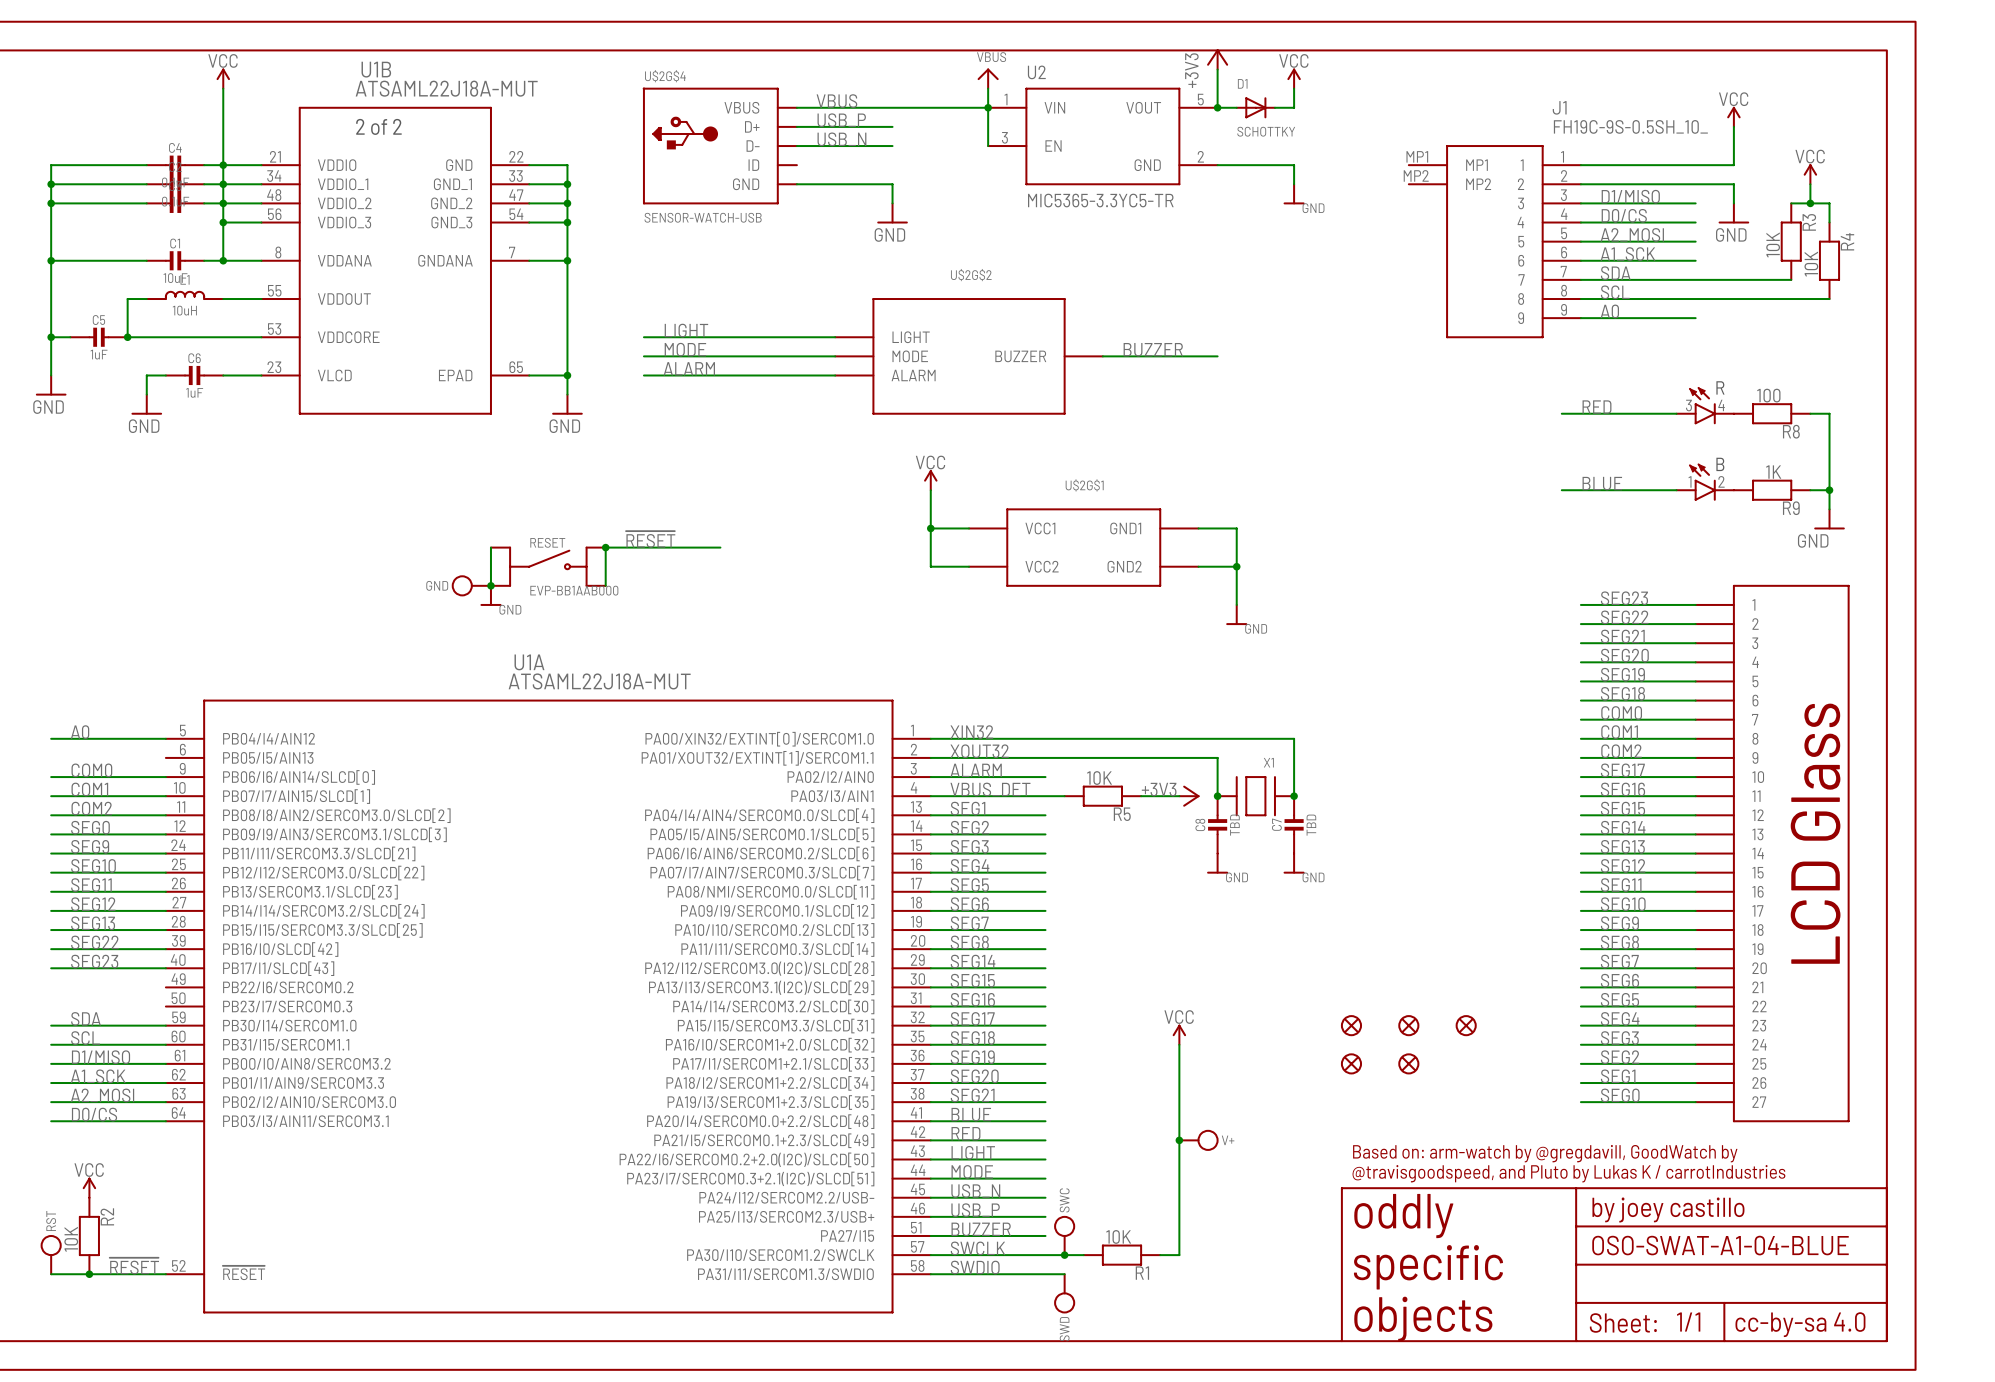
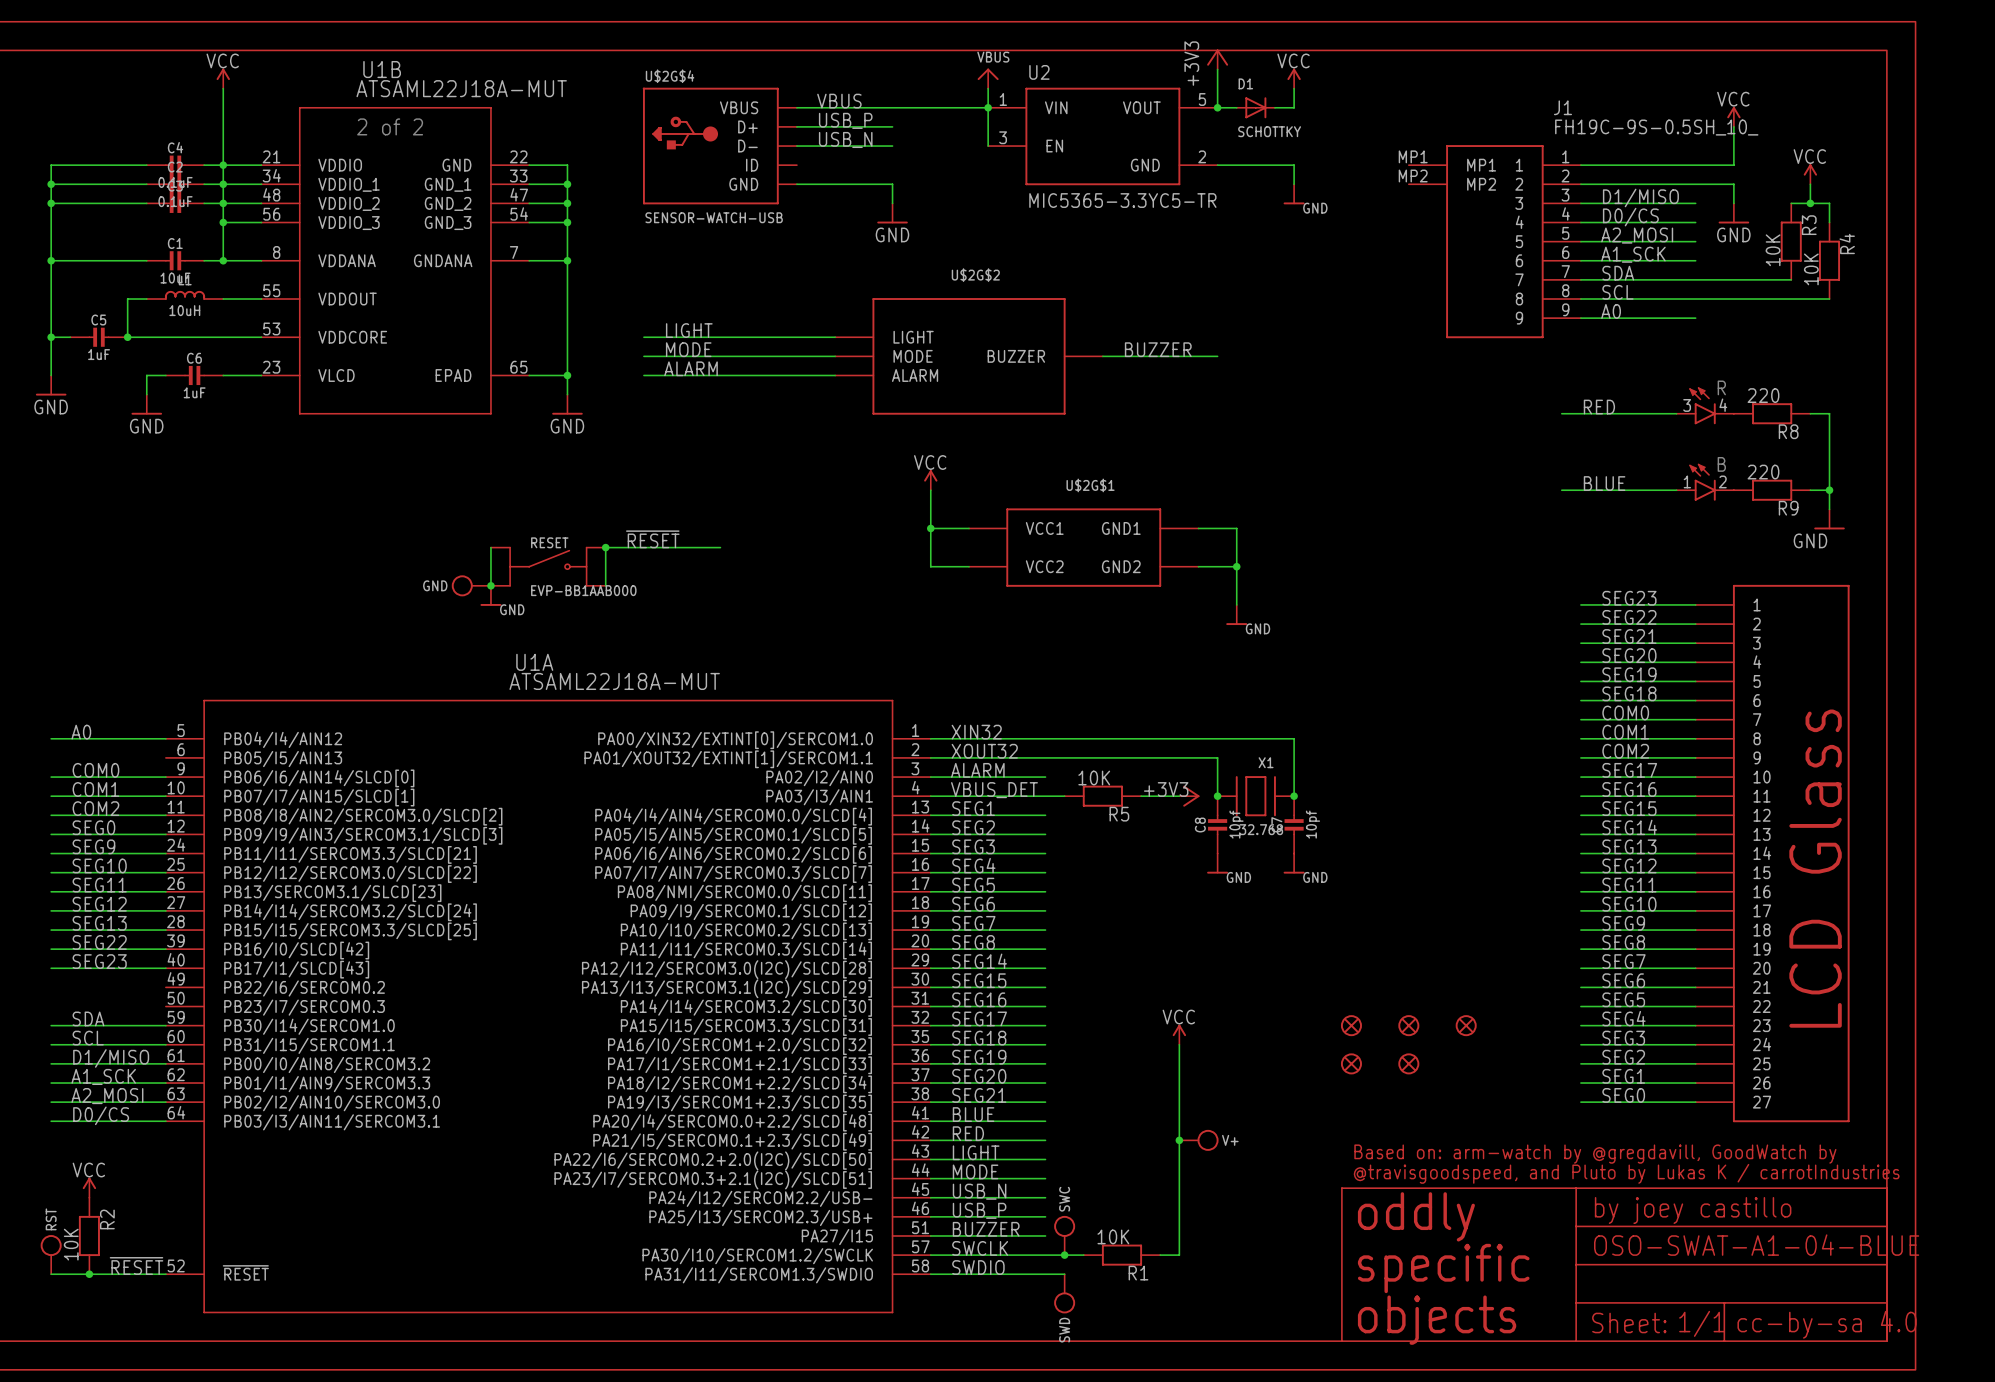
R8 value: 100 (1768, 395) -> 220 (1763, 395)
R9 value: 1K (1773, 472) -> 220 (1763, 472)
C8 value: TBD (1234, 825) -> 10pf (1236, 824)
C7 value: TBD (1311, 825) -> 10pf (1313, 824)
X1 value: none -> 32.768 (1261, 829)

